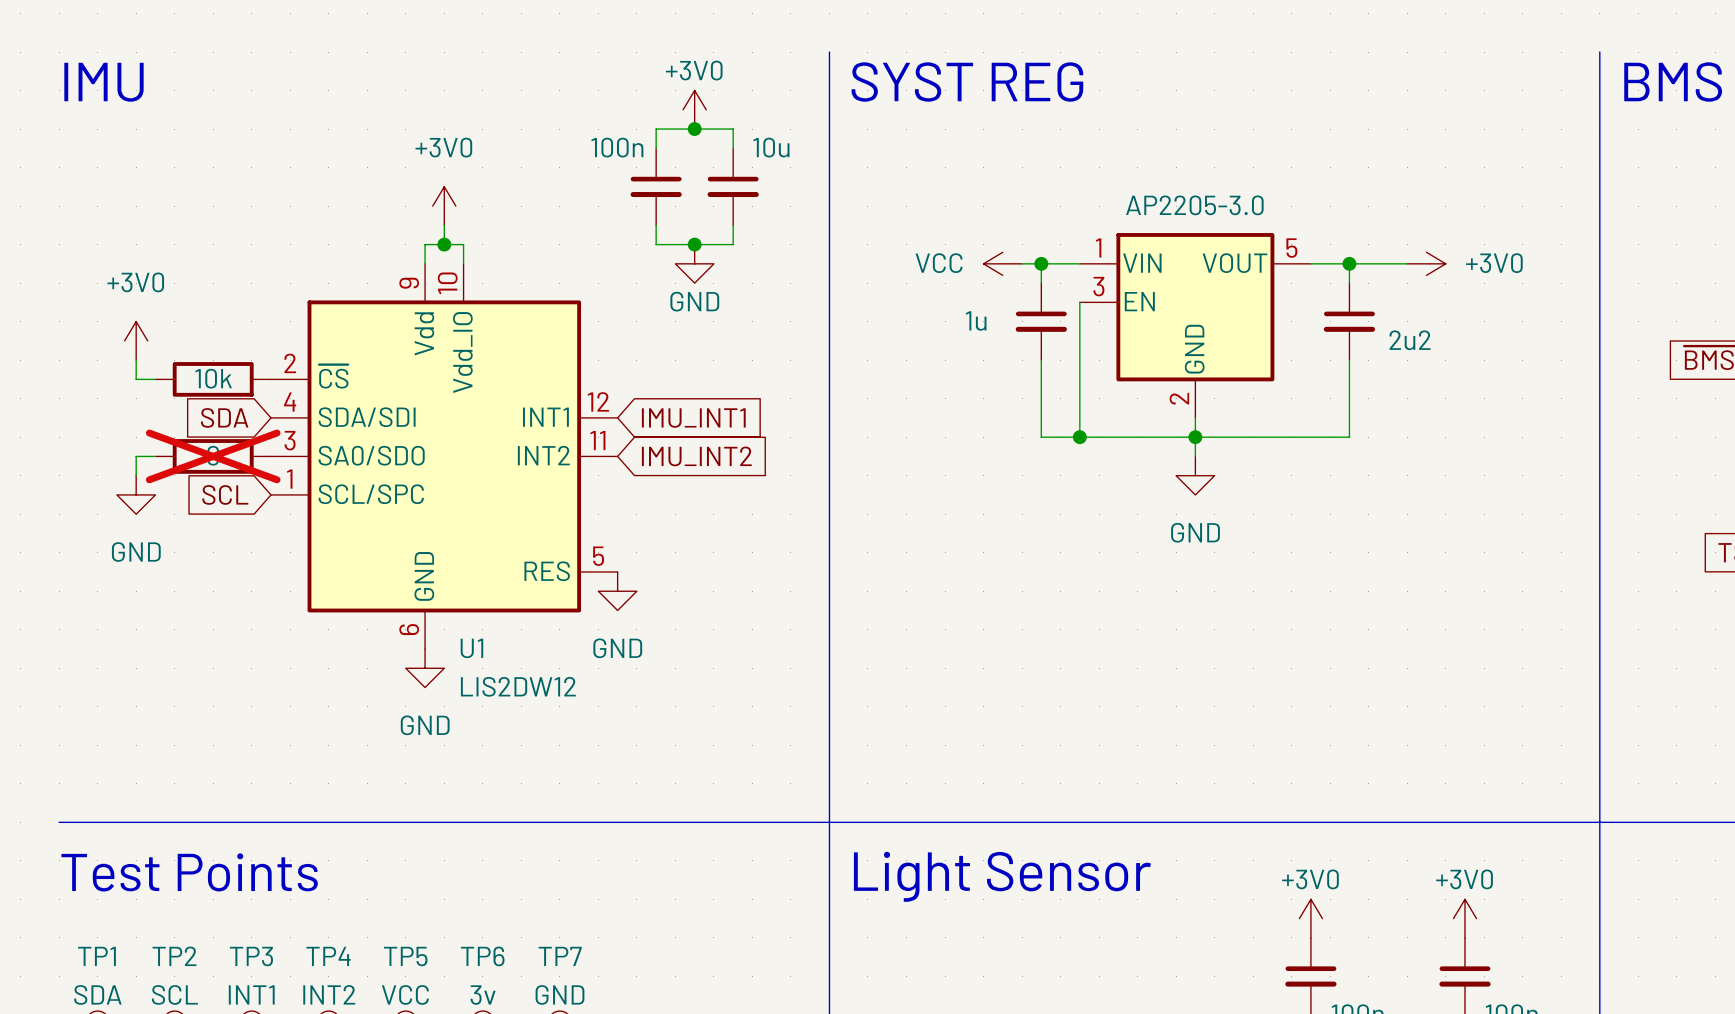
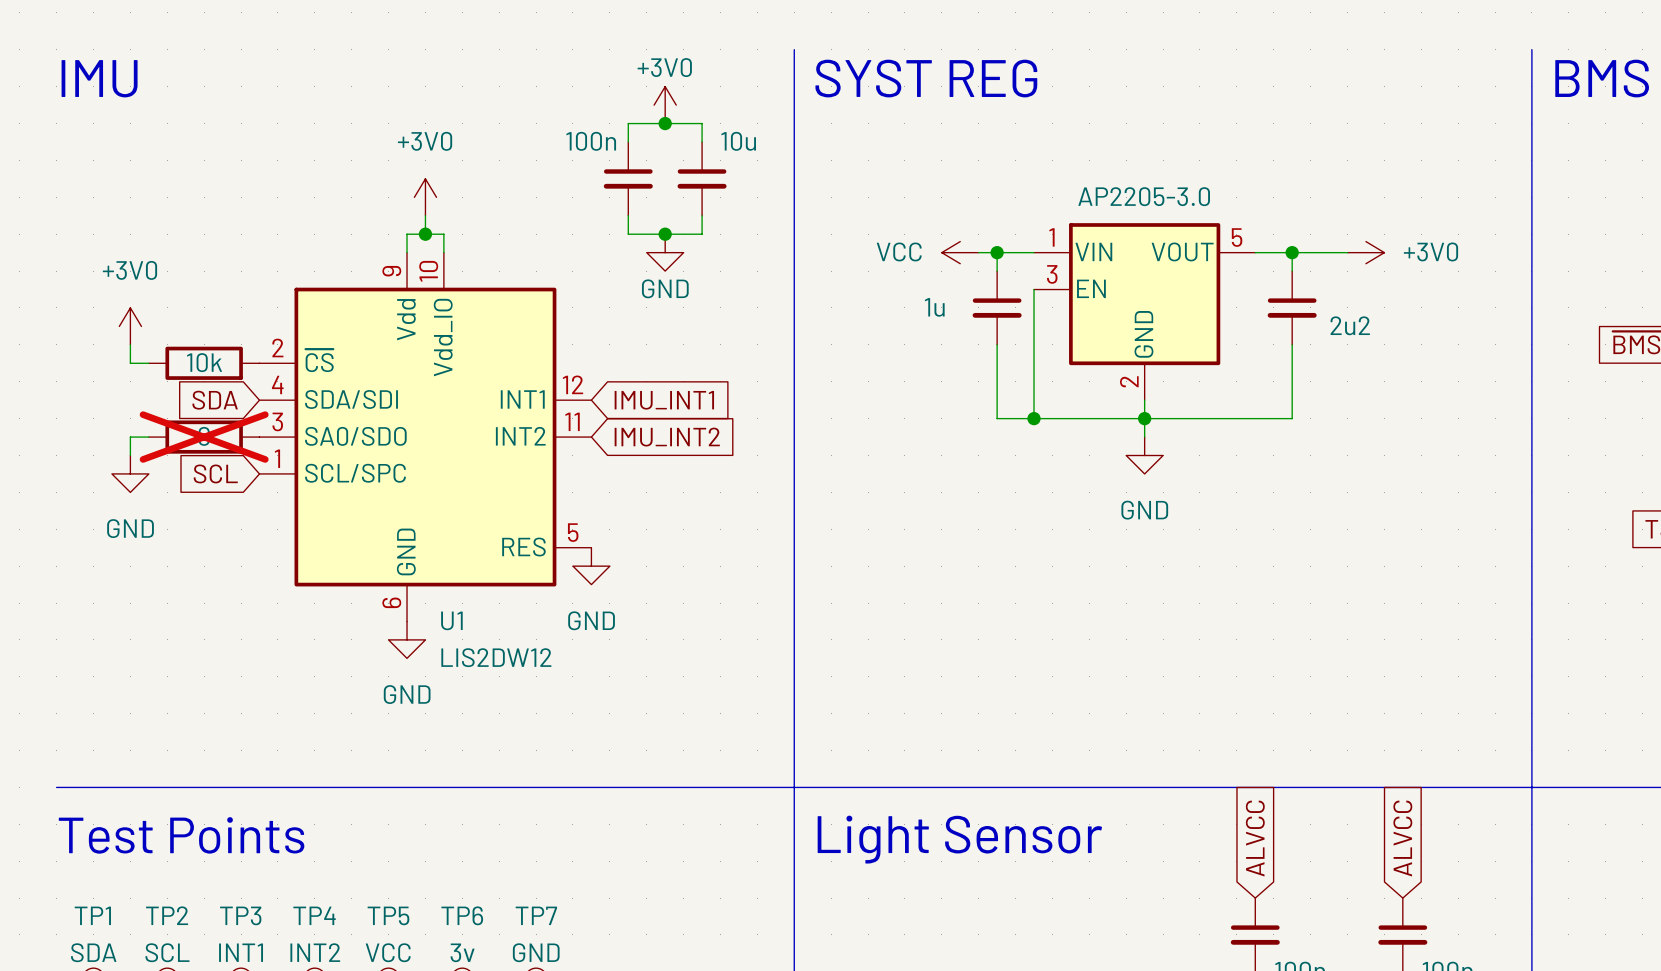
global label: none -> ALVCC (1255, 838)
global label: none -> ALVCC (1402, 838)
power symbol: +3V0 (1310, 918) -> none
power symbol: +3V0 (1465, 918) -> none

